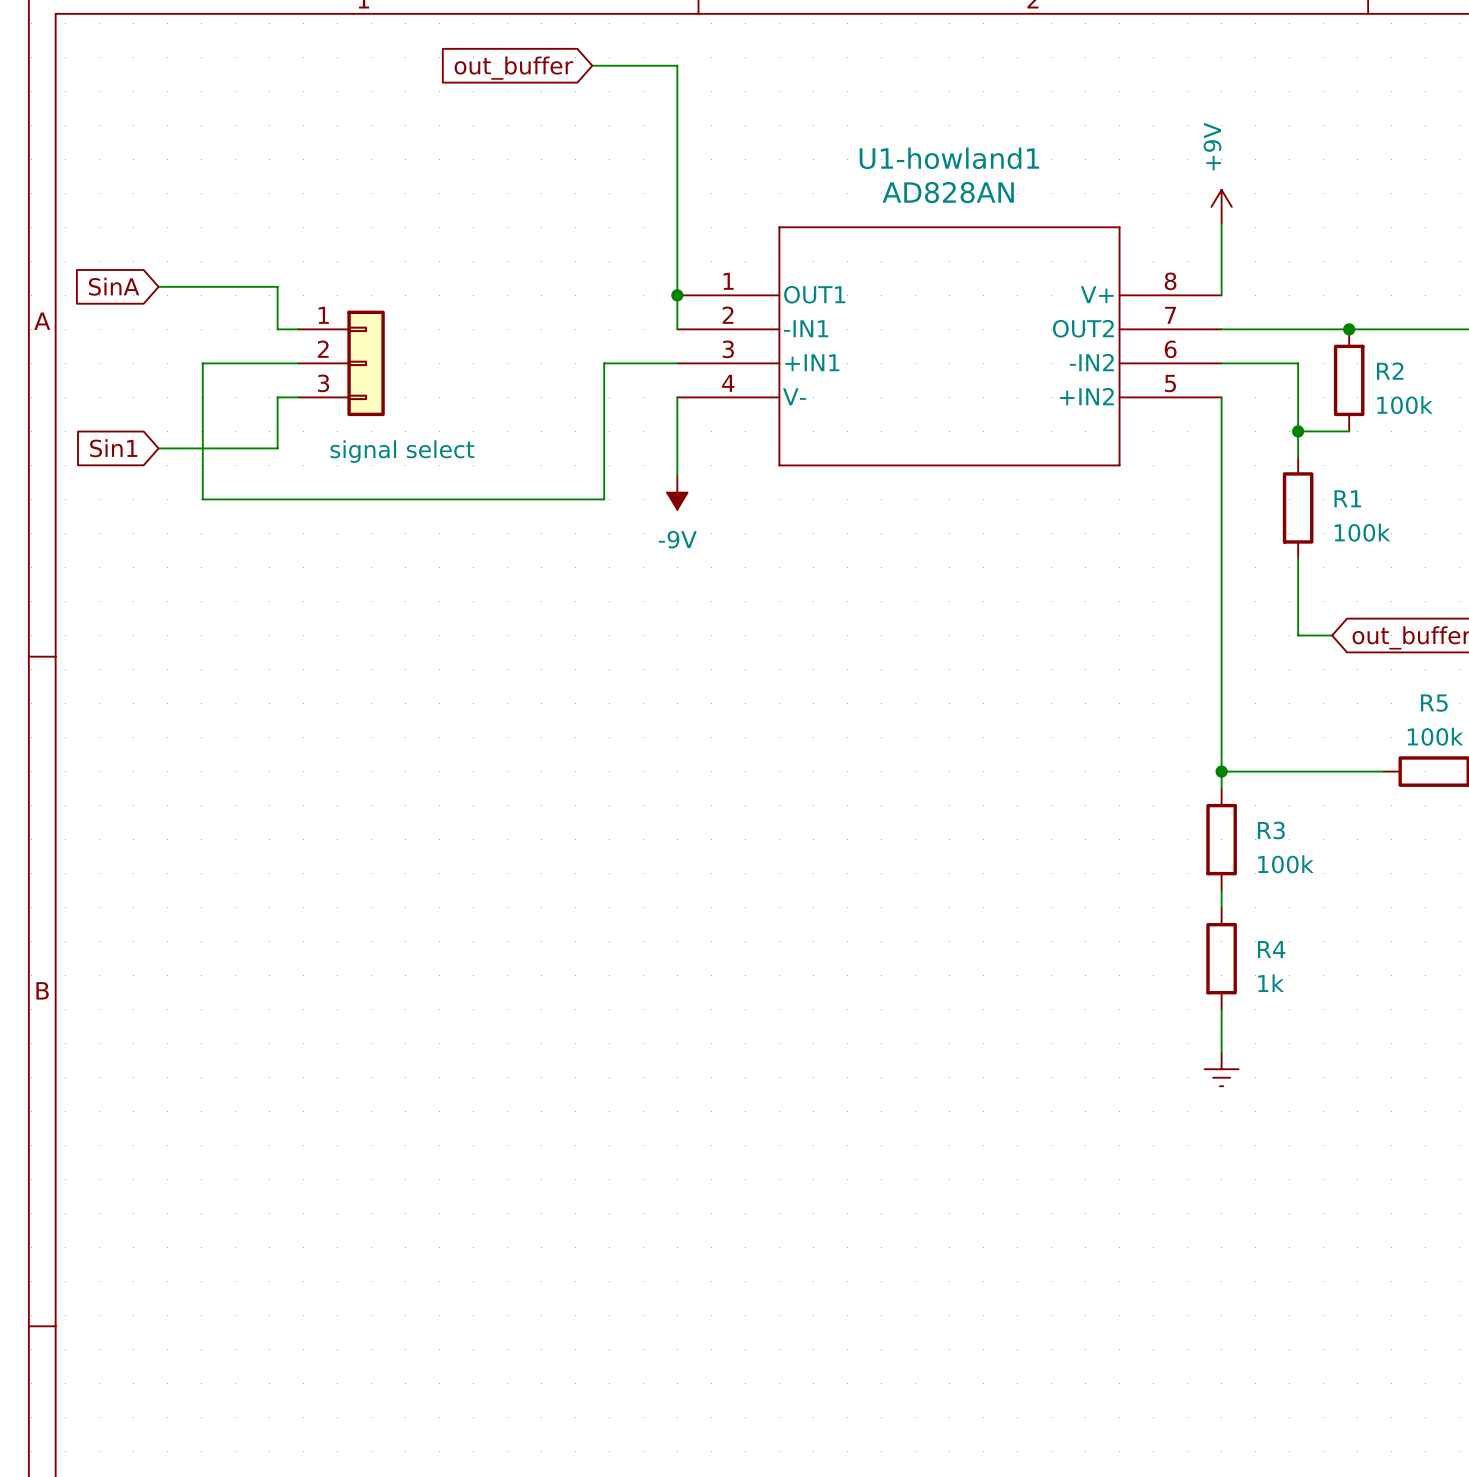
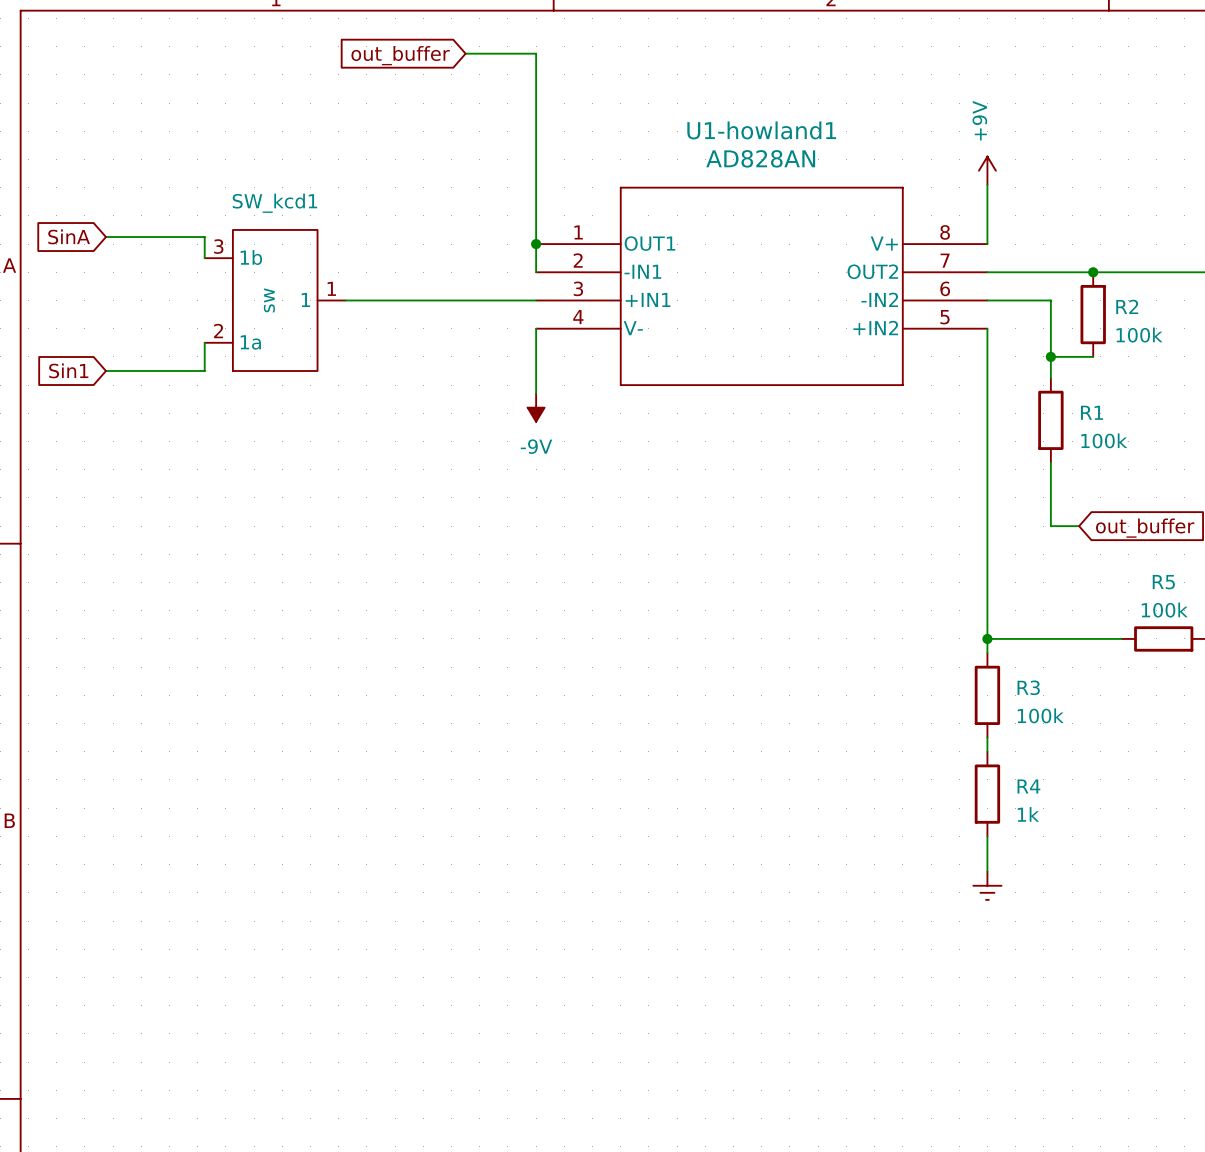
wire: (277, 312) (277, 329) (298, 329) -> none
wire: (298, 363) (202, 363) (202, 499) (604, 499) (604, 363) -> (345, 300) (475, 300)
part: signal select (341, 363) -> none
SW_kcd1: none -> sw (275, 300)
wire: (298, 397) (277, 397) (277, 414) -> none

